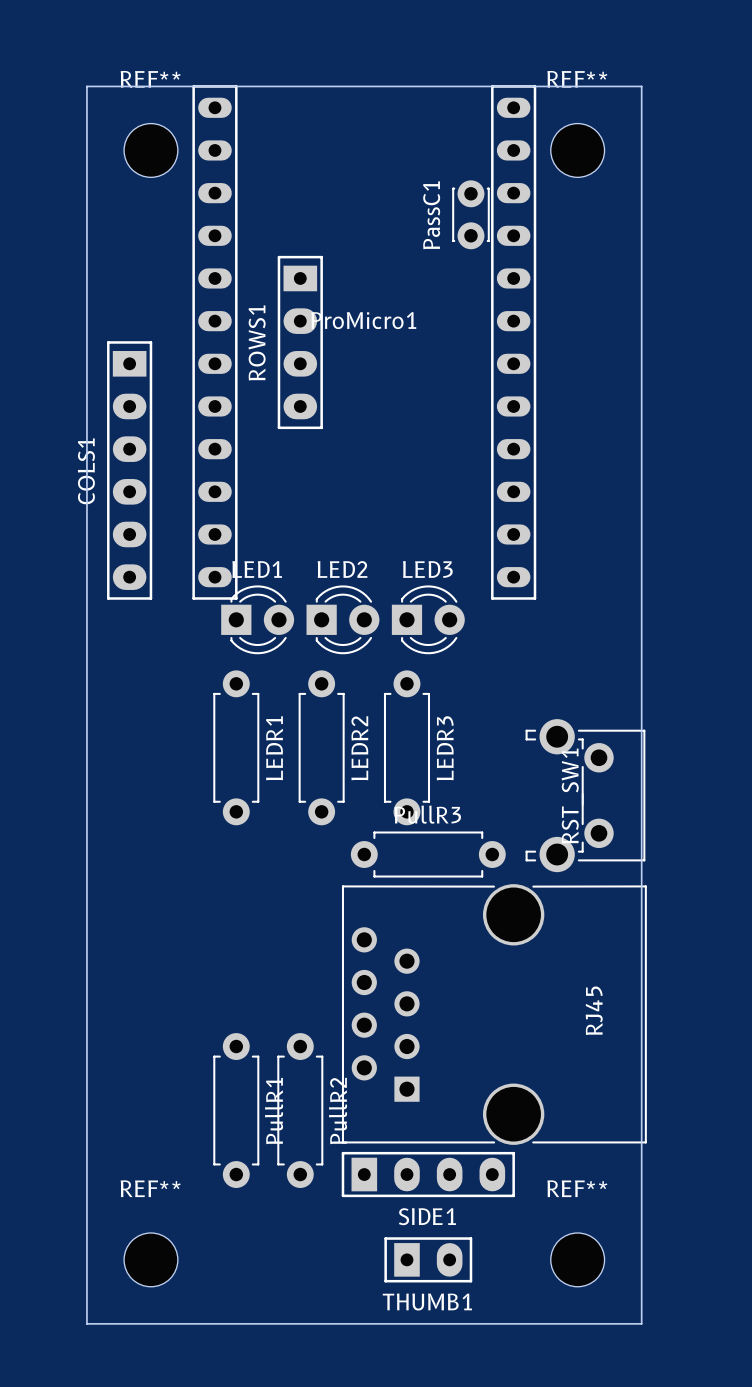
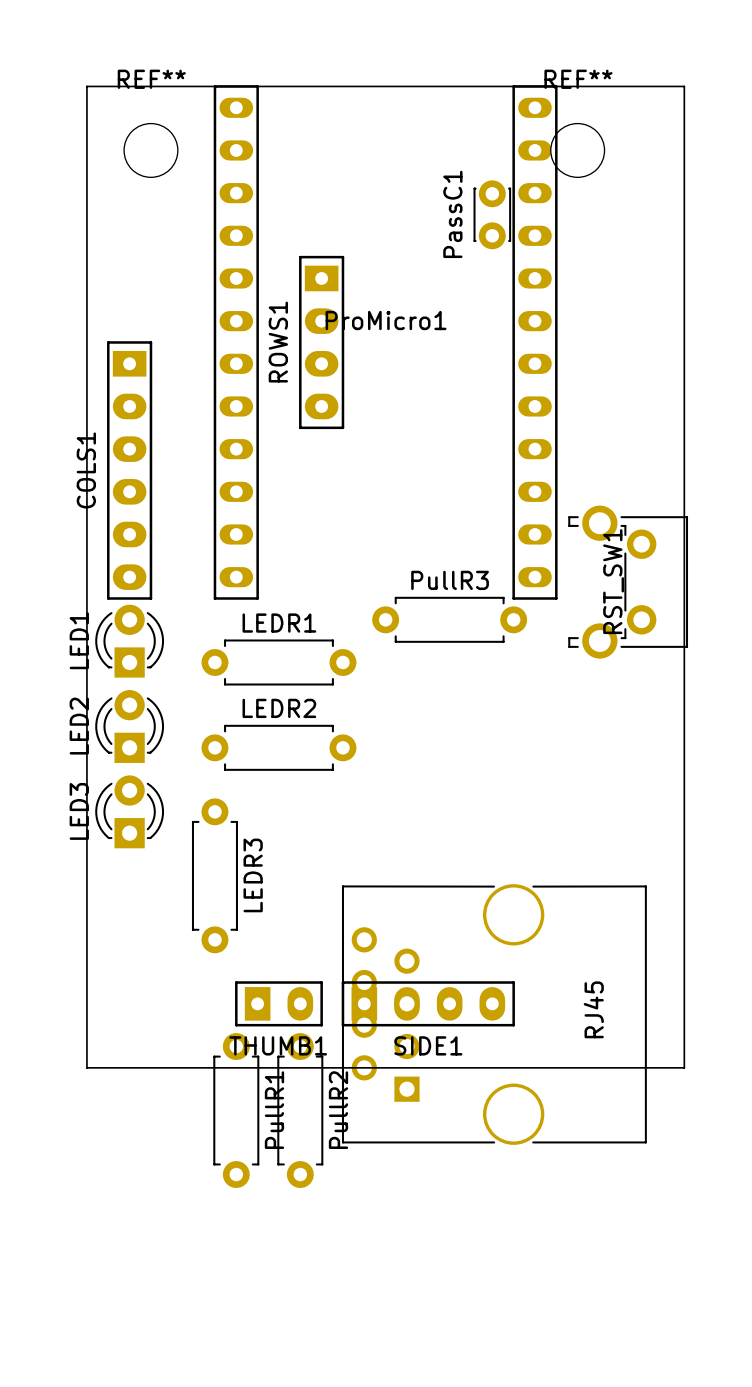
board edge: (641, 86) (641, 1323) (86, 1323) (86, 1067) -> (641, 86) (684, 86) (684, 1067) (86, 1067)
PassC1 position: (470, 214) -> (492, 214)
ROWS1 position: (300, 342) -> (321, 342)
ProMicro1 position: (364, 342) -> (385, 342)
LED1 rotation: 0° (257, 619) -> 90° counterclockwise (129, 641)
LED1 position: (257, 619) -> (129, 641)
LED2 rotation: 0° (342, 619) -> 90° counterclockwise (129, 726)
LED2 position: (342, 619) -> (129, 726)
LED3 rotation: 0° (428, 619) -> 90° counterclockwise (129, 811)
LED3 position: (428, 619) -> (129, 811)
LEDR1 rotation: 0° (236, 747) -> 90° clockwise (278, 662)
LEDR1 position: (236, 747) -> (278, 662)
LEDR2 rotation: 0° (321, 747) -> 90° clockwise (278, 747)
LEDR3 position: (406, 747) -> (214, 875)
LEDR1 name position: LEDR1 (274, 748) -> LEDR1 (279, 623)
LEDR2 name position: LEDR2 (359, 748) -> LEDR2 (279, 708)
RST_SW1 position: (585, 795) -> (628, 582)
PullR3 position: (428, 854) -> (449, 619)
SIDE1 position: (428, 1174) -> (428, 1003)
REF**: (150, 1259) -> none
THUMB1 position: (428, 1259) -> (278, 1003)
REF**: (577, 1259) -> none

